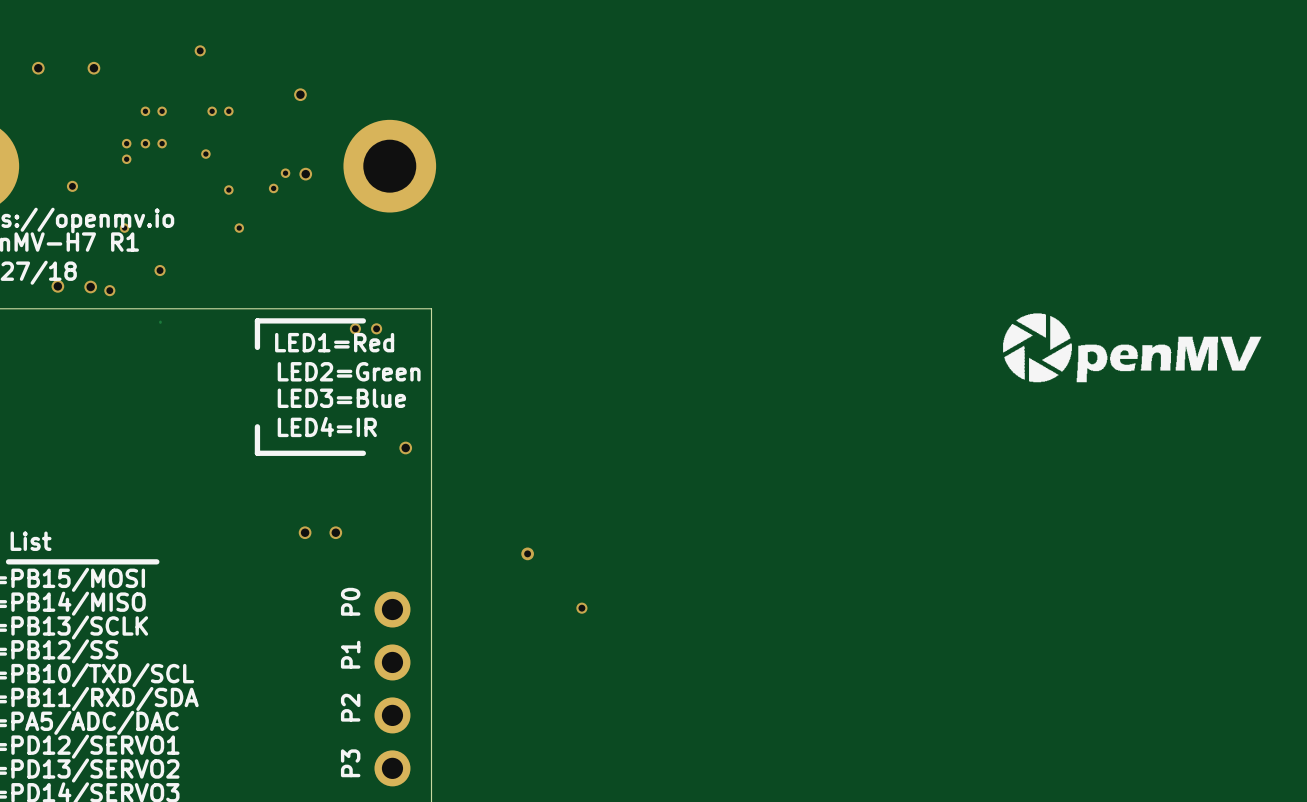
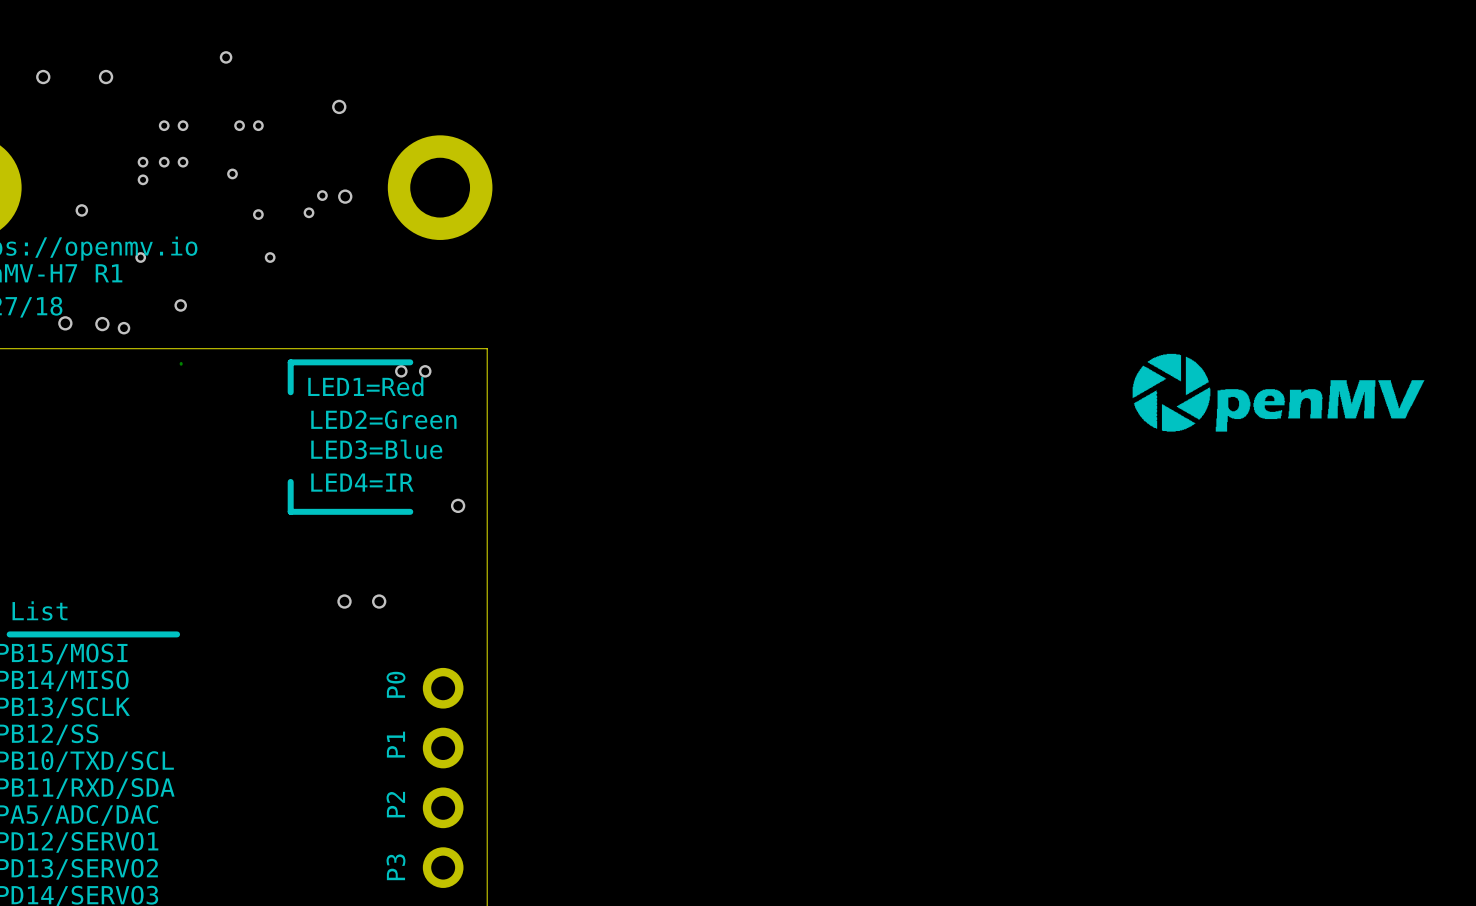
via: (527, 553) -> none
via: (581, 608) -> none

